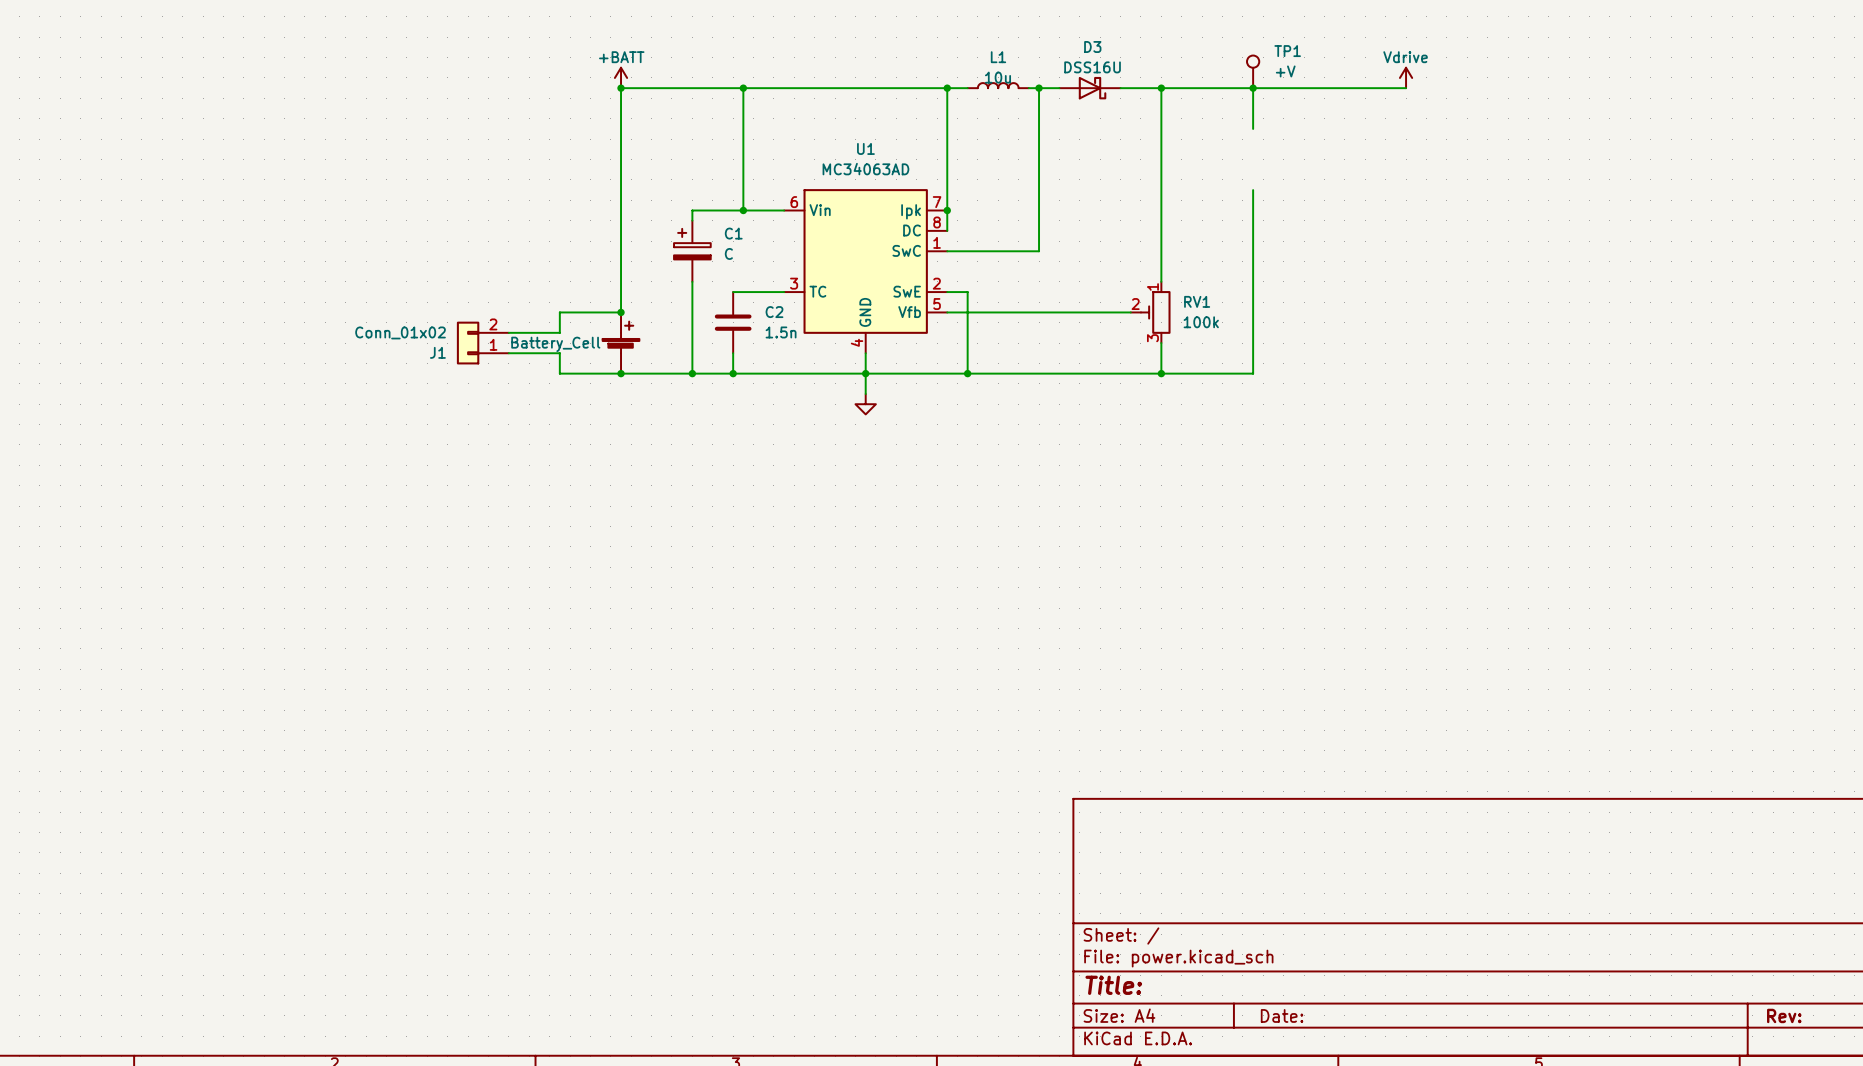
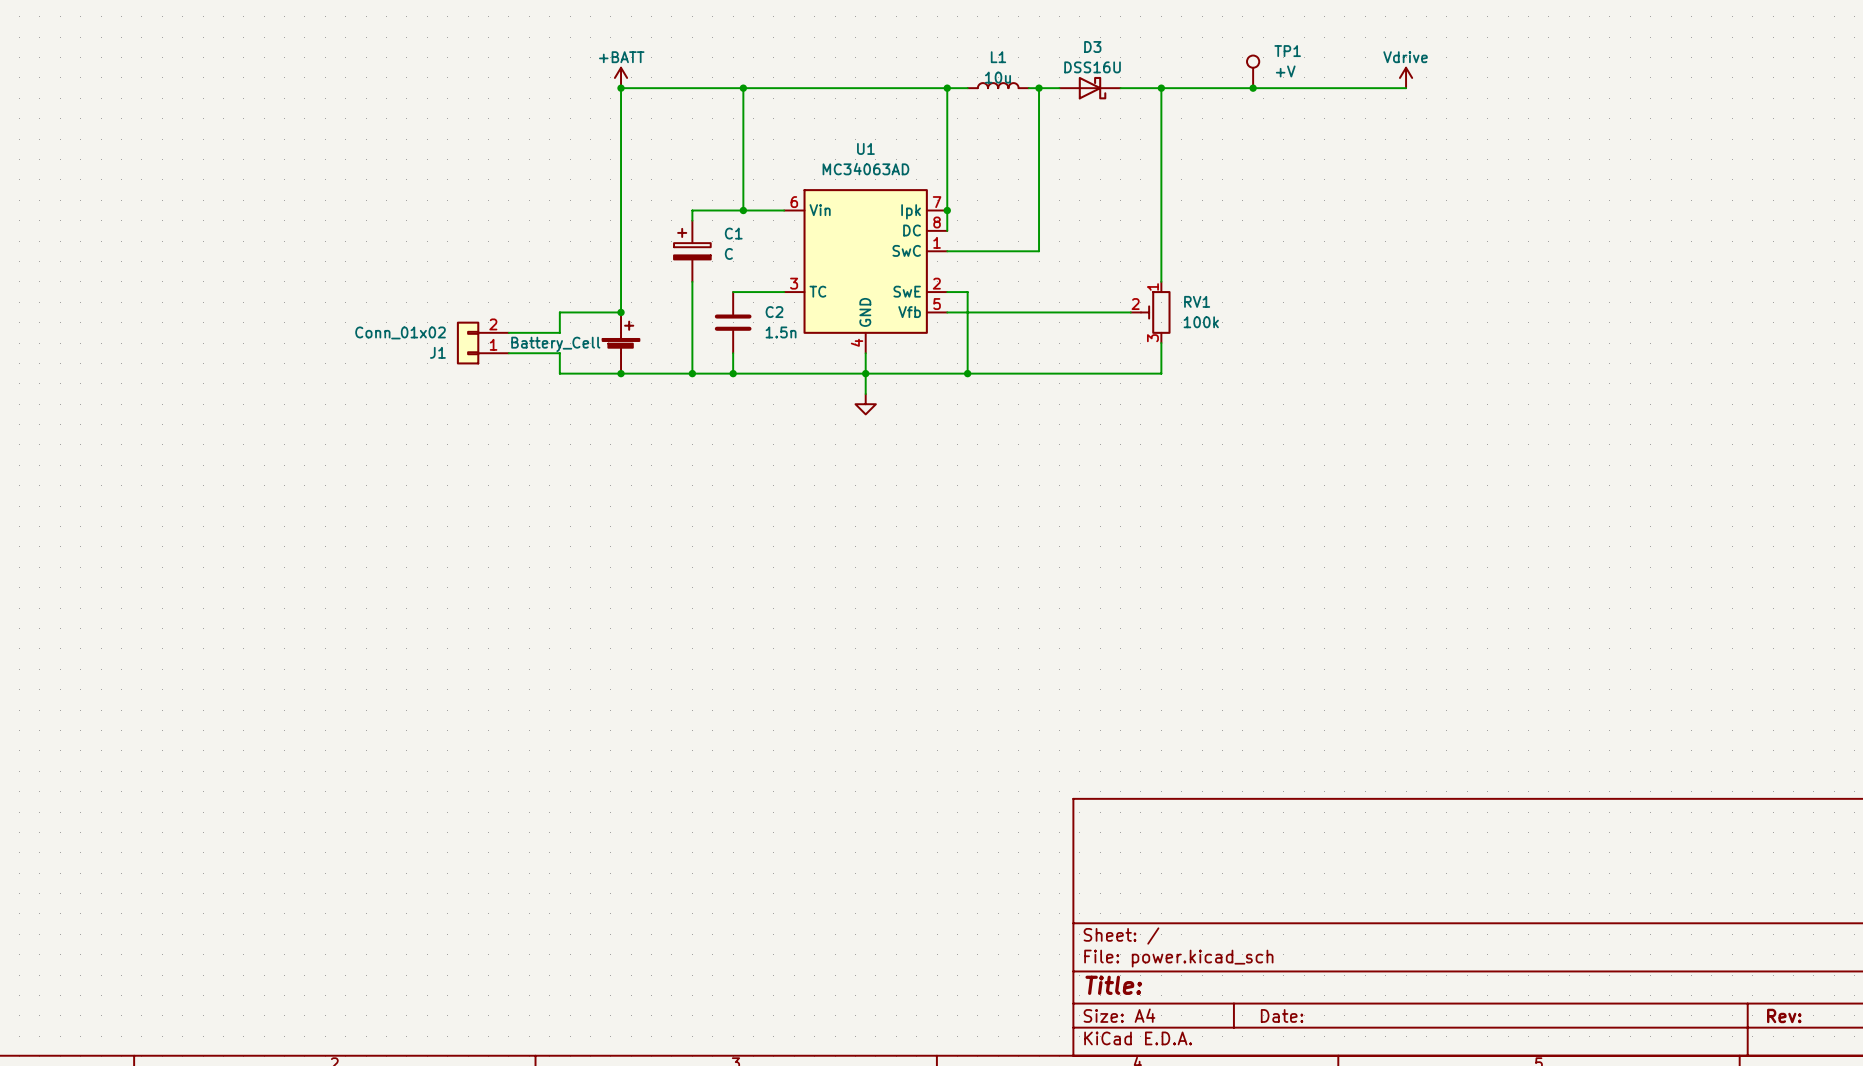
wire: (1253, 88) (1253, 128) -> none
wire: (1253, 190) (1253, 373) (1161, 373) -> none
junction: (1161, 373) -> none

